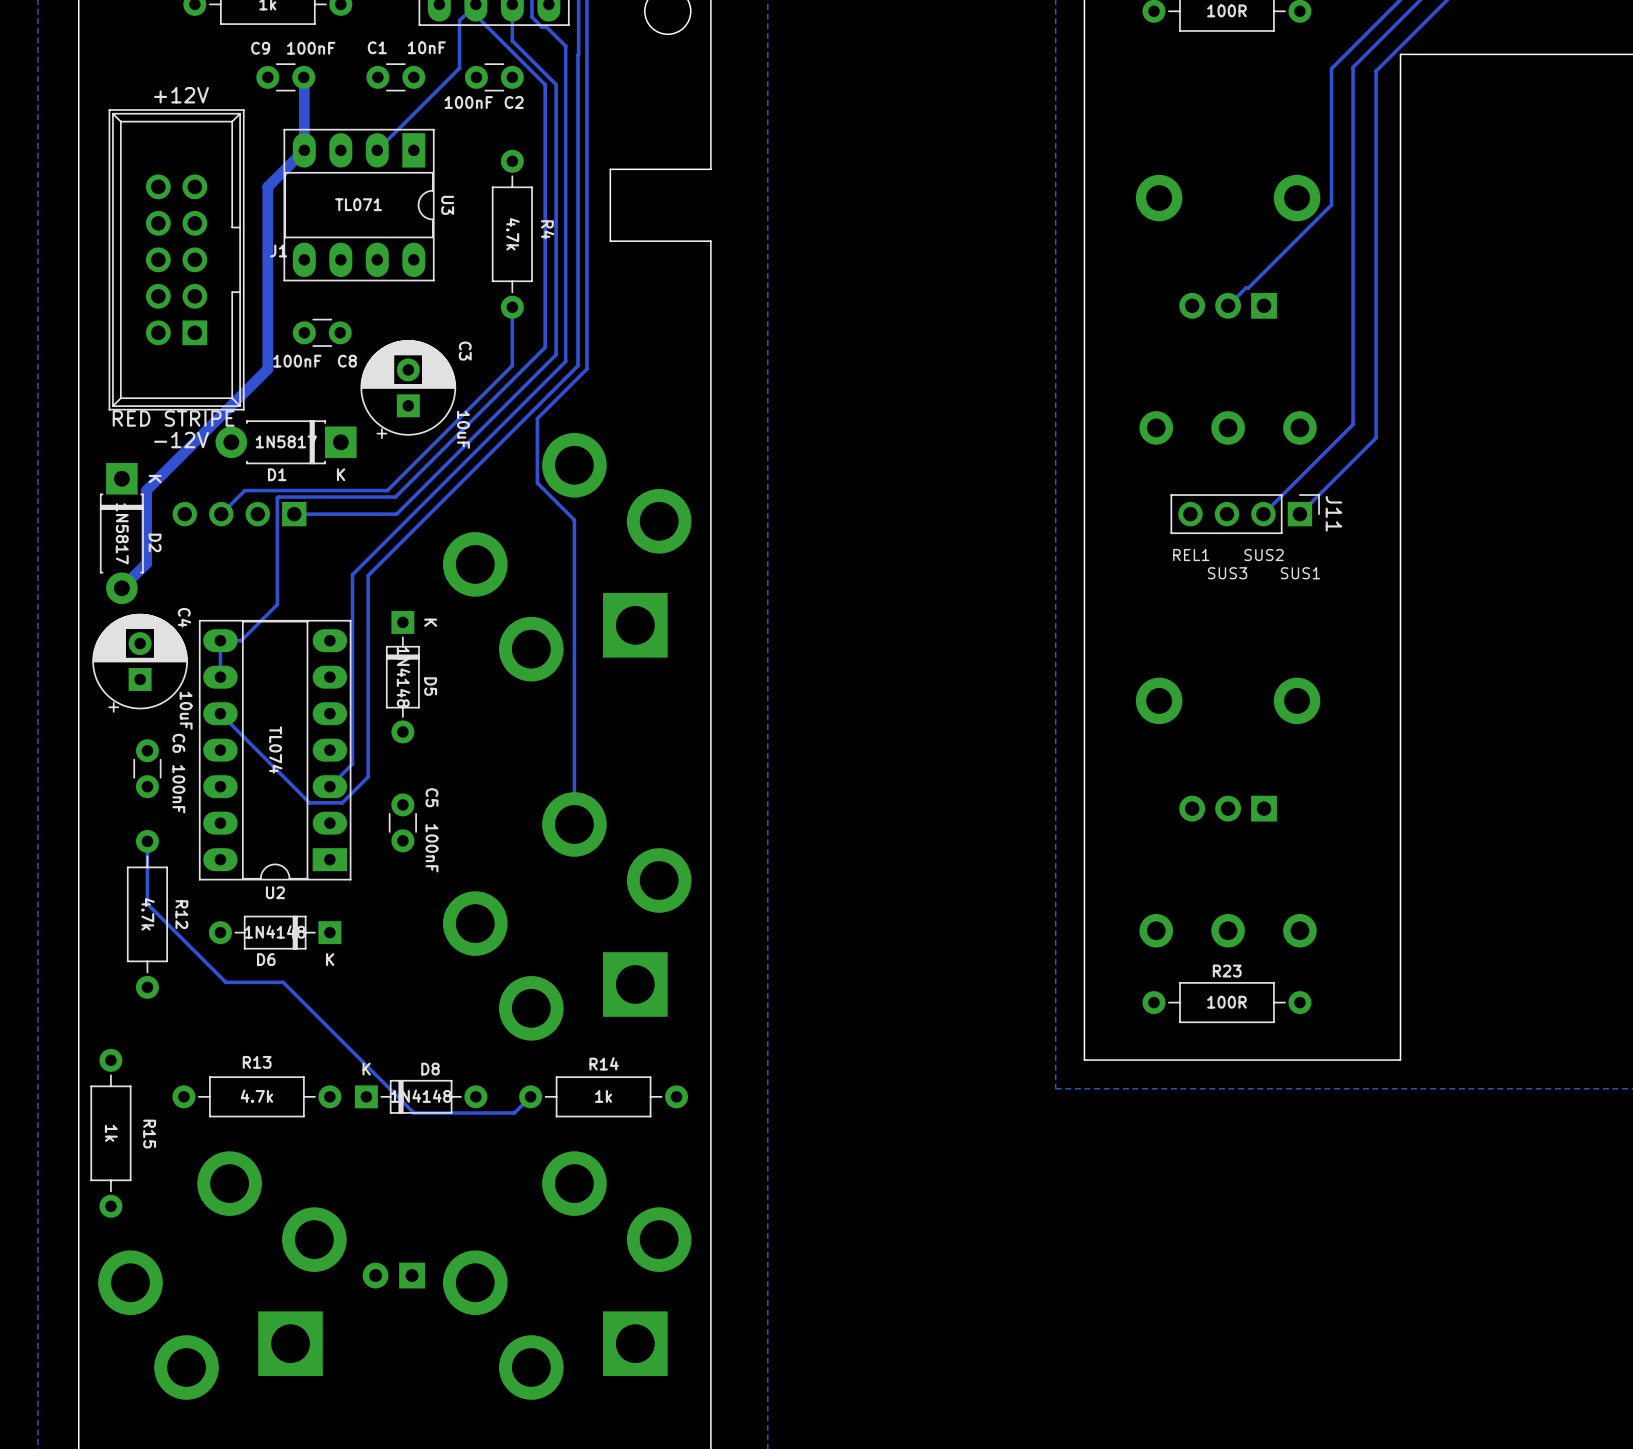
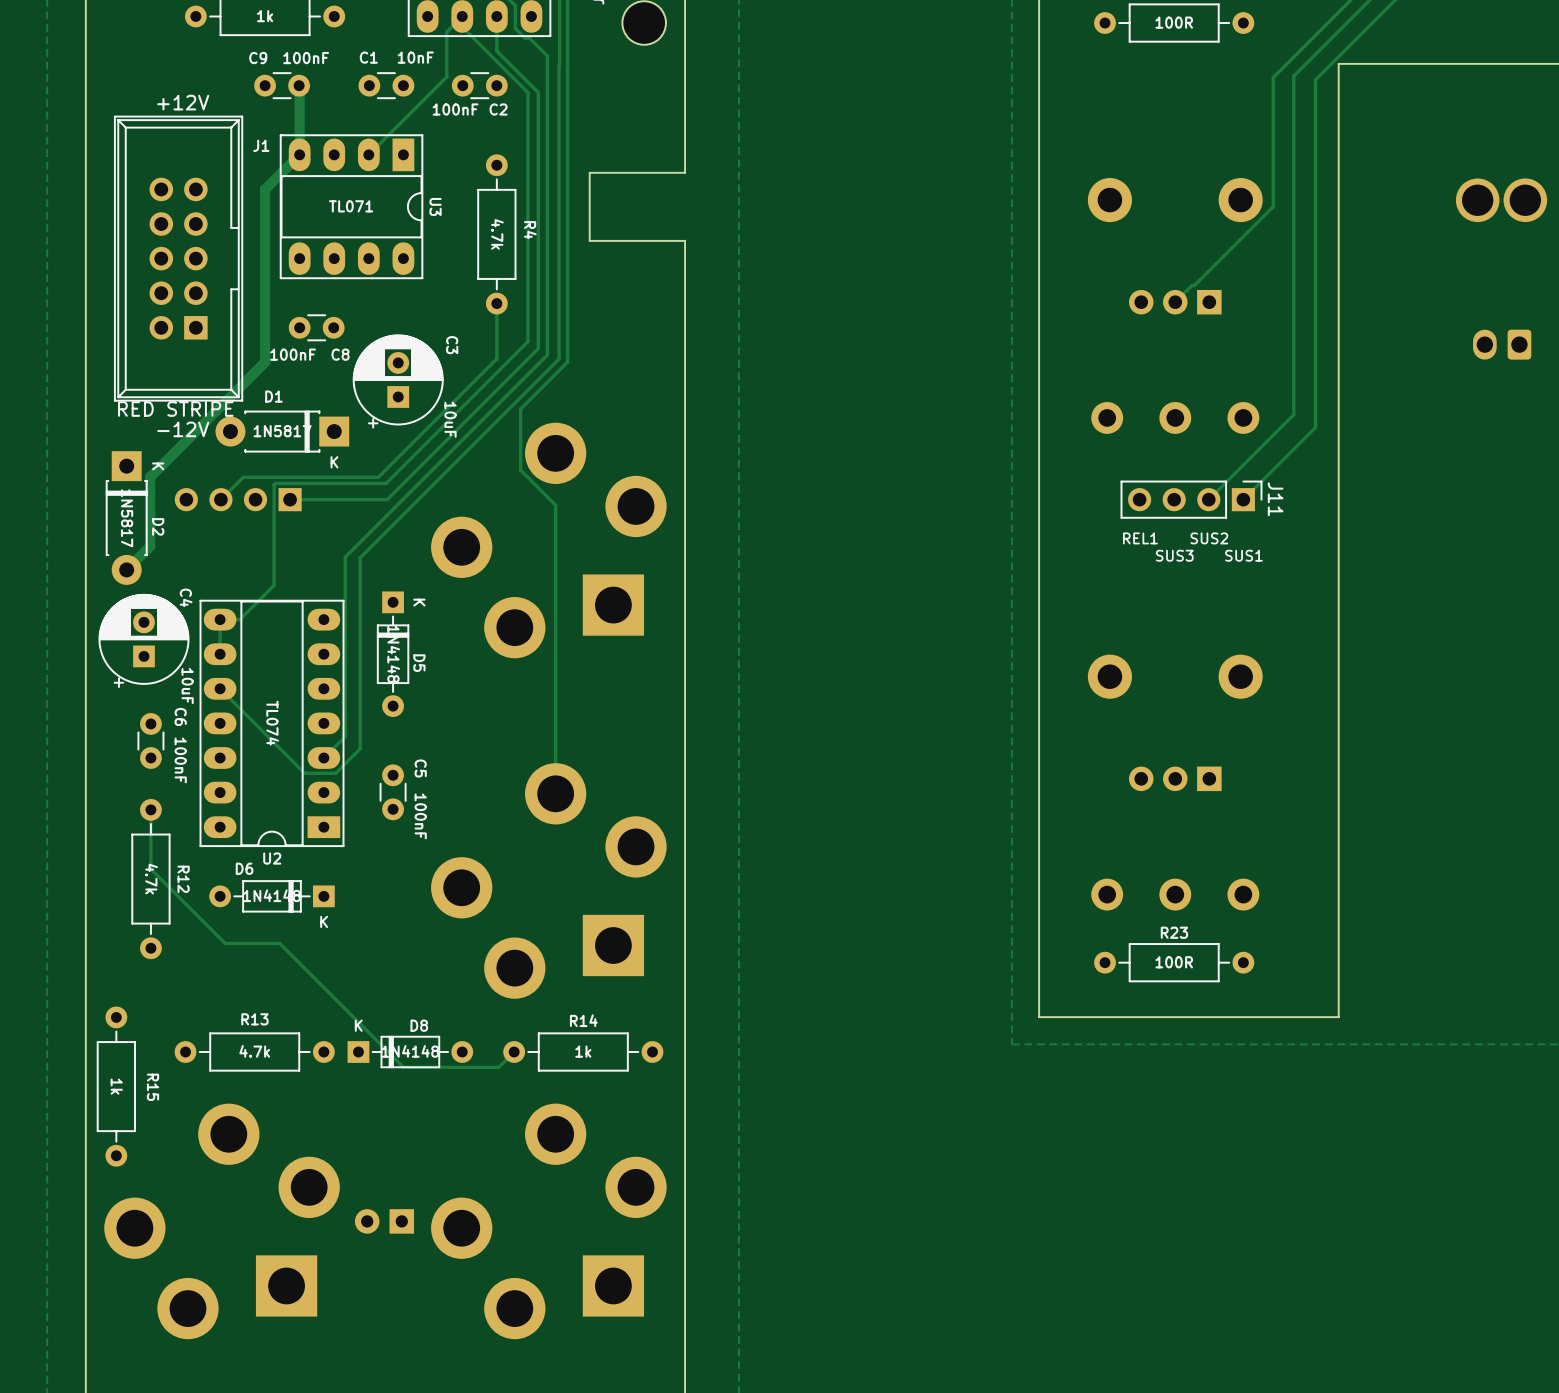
part: none -> (1501, 200)
J1 name position: J1 (278, 250) -> J1 (261, 145)
part: none -> (1502, 344)
D1 name position: D1 (277, 474) -> D1 (273, 396)
D6 name position: D6 (266, 959) -> D6 (244, 868)

